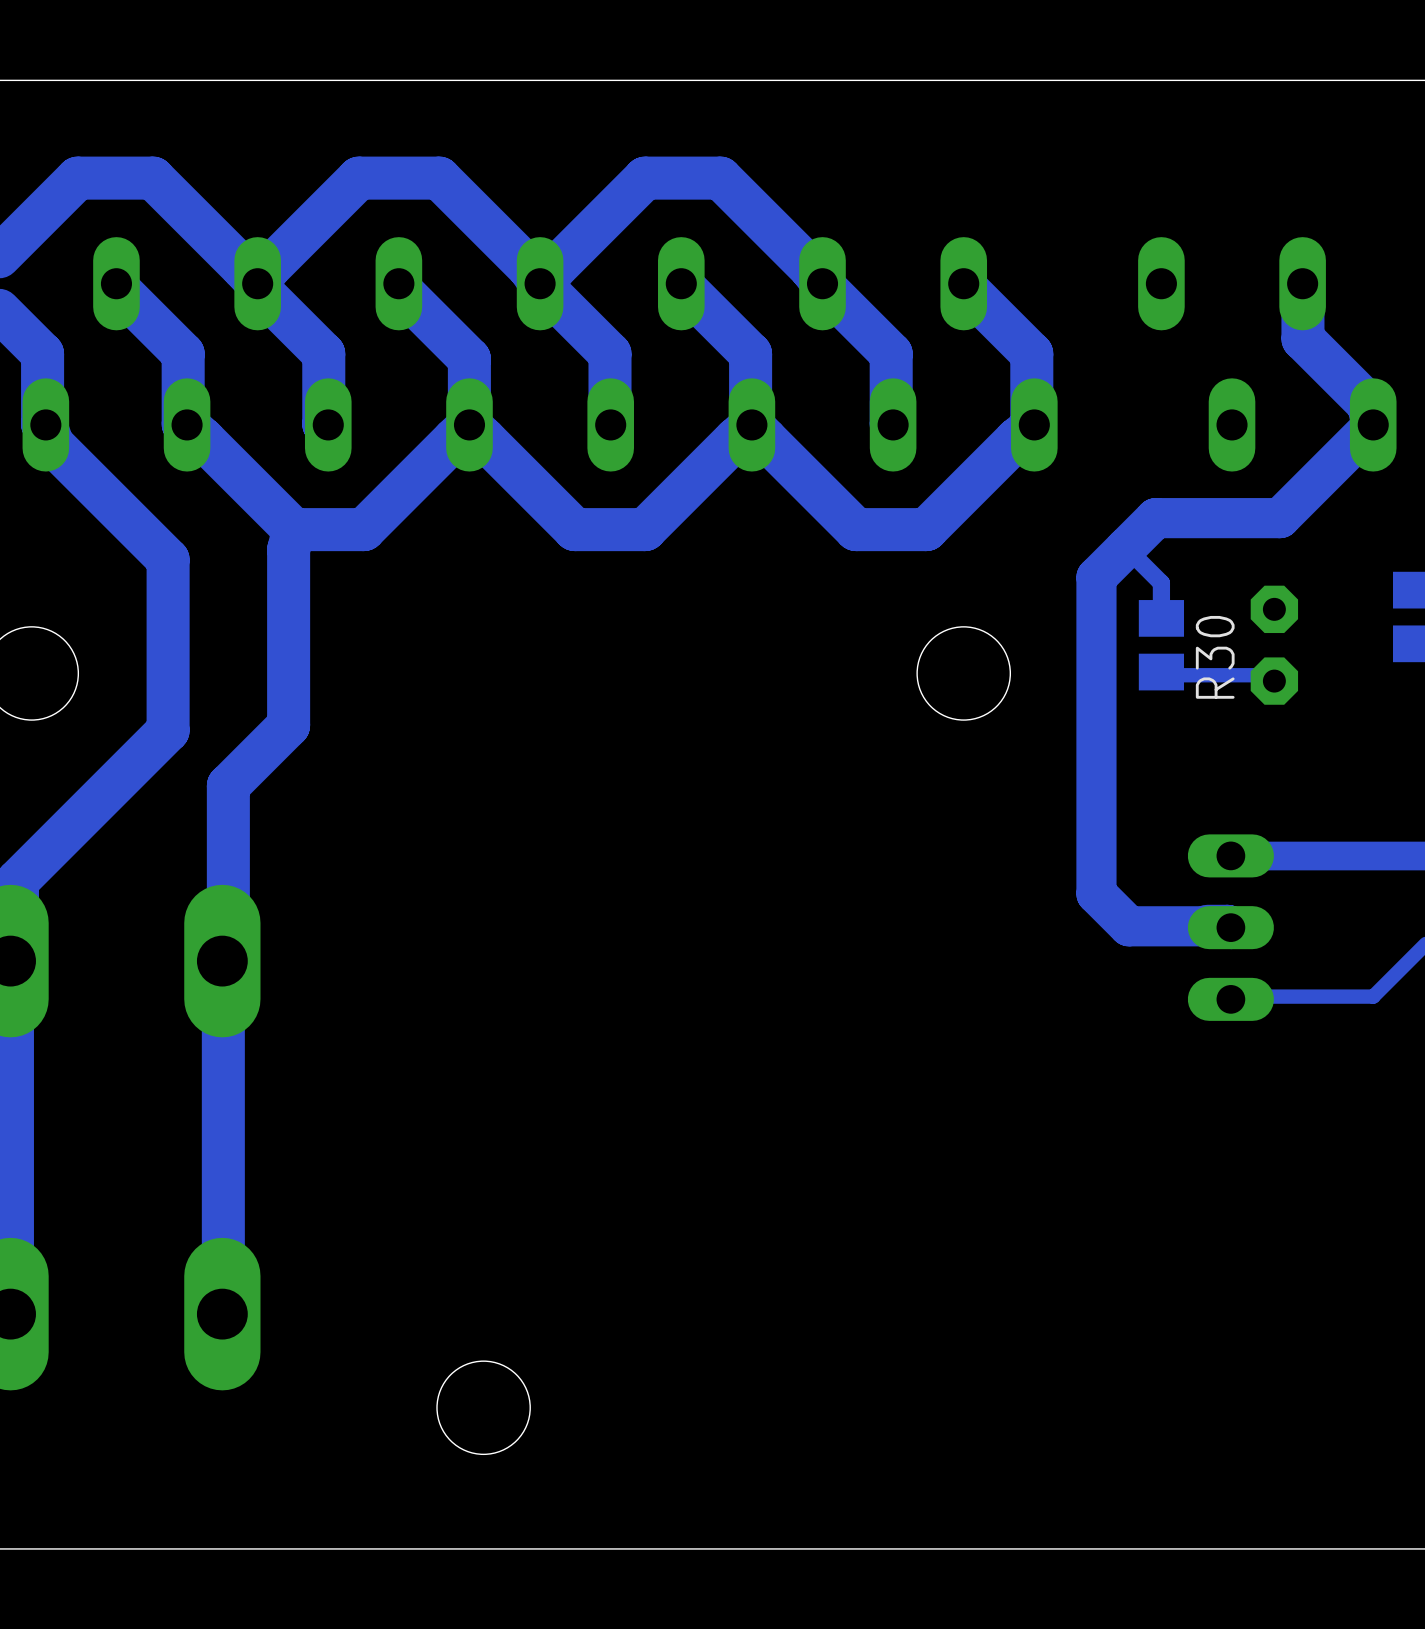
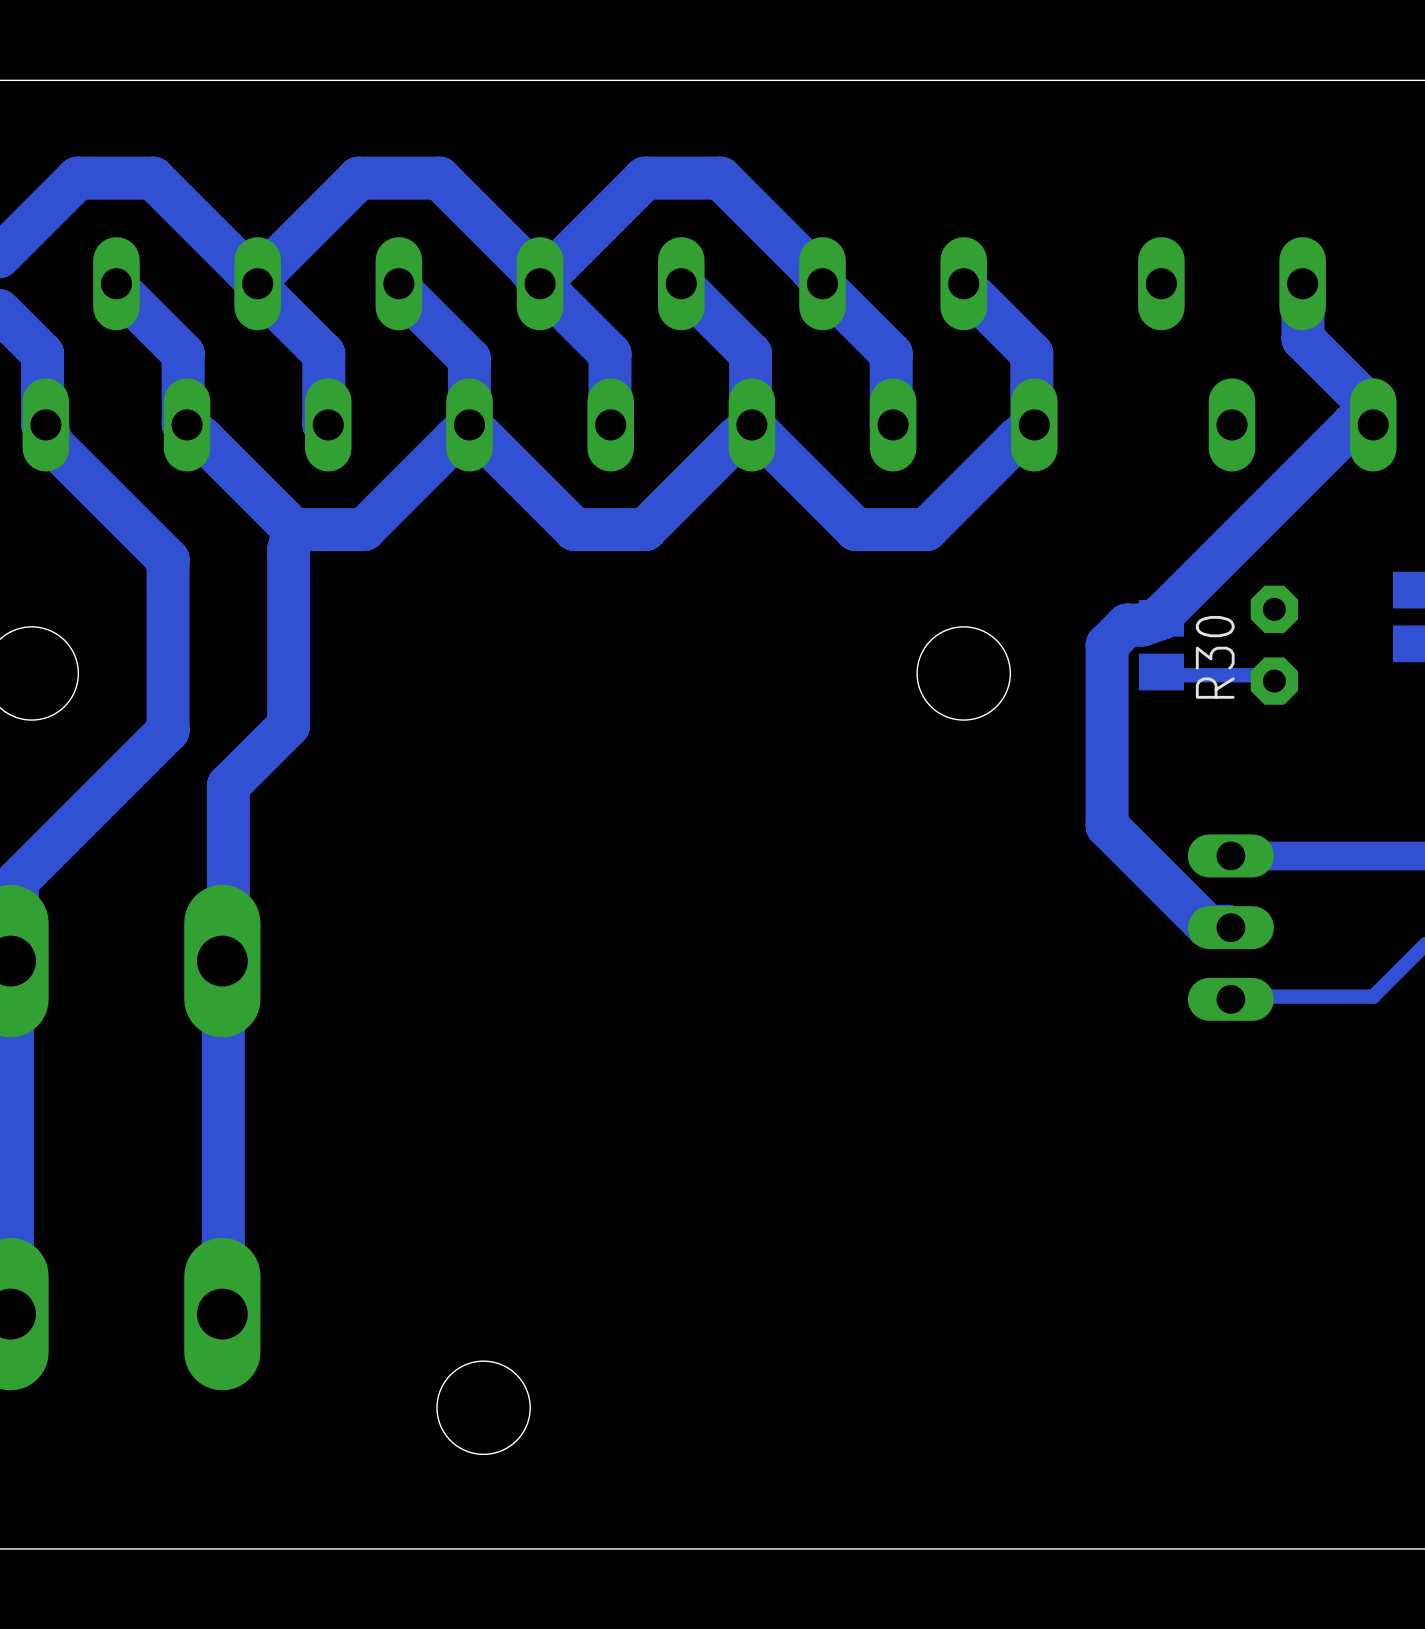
track: (1373, 424) (1280, 518) (1155, 518) (1096, 577) (1096, 893) (1129, 926) (1207, 926) -> (1373, 424) (1353, 424) (1162, 614) (1161, 618) (1142, 625) (1127, 625) (1107, 645) (1107, 825) (1207, 926)
track: (1126, 547) (1161, 583) (1161, 618) -> none

